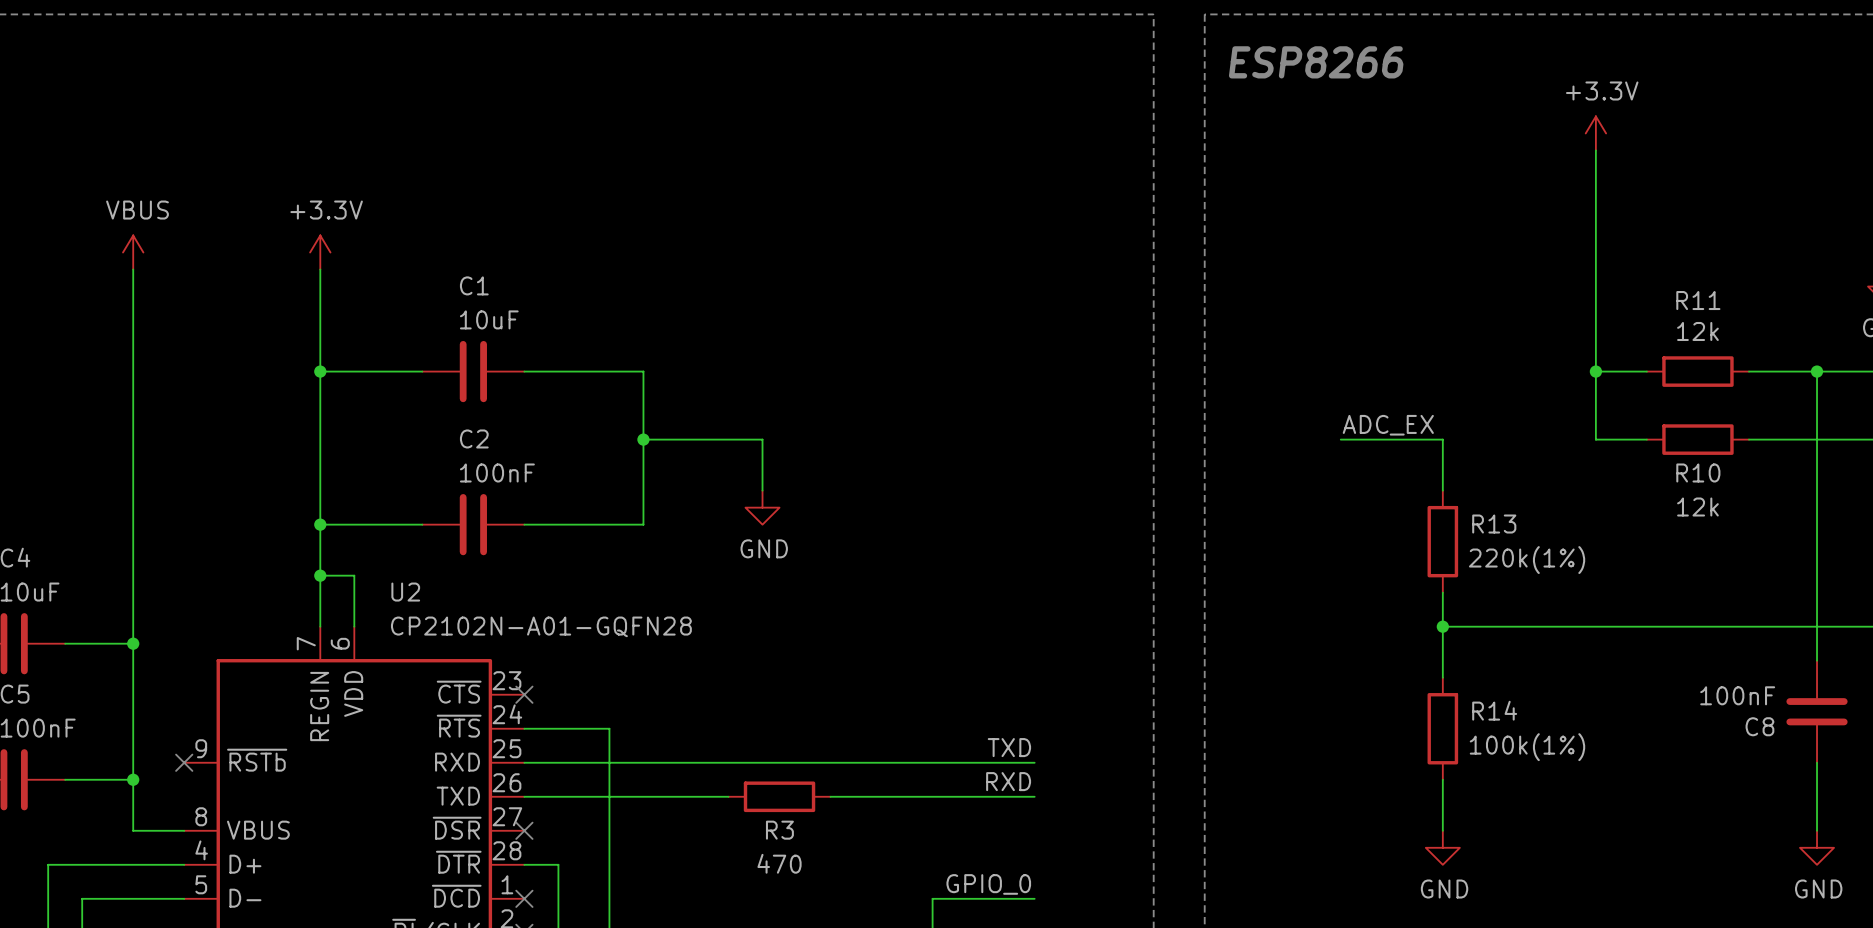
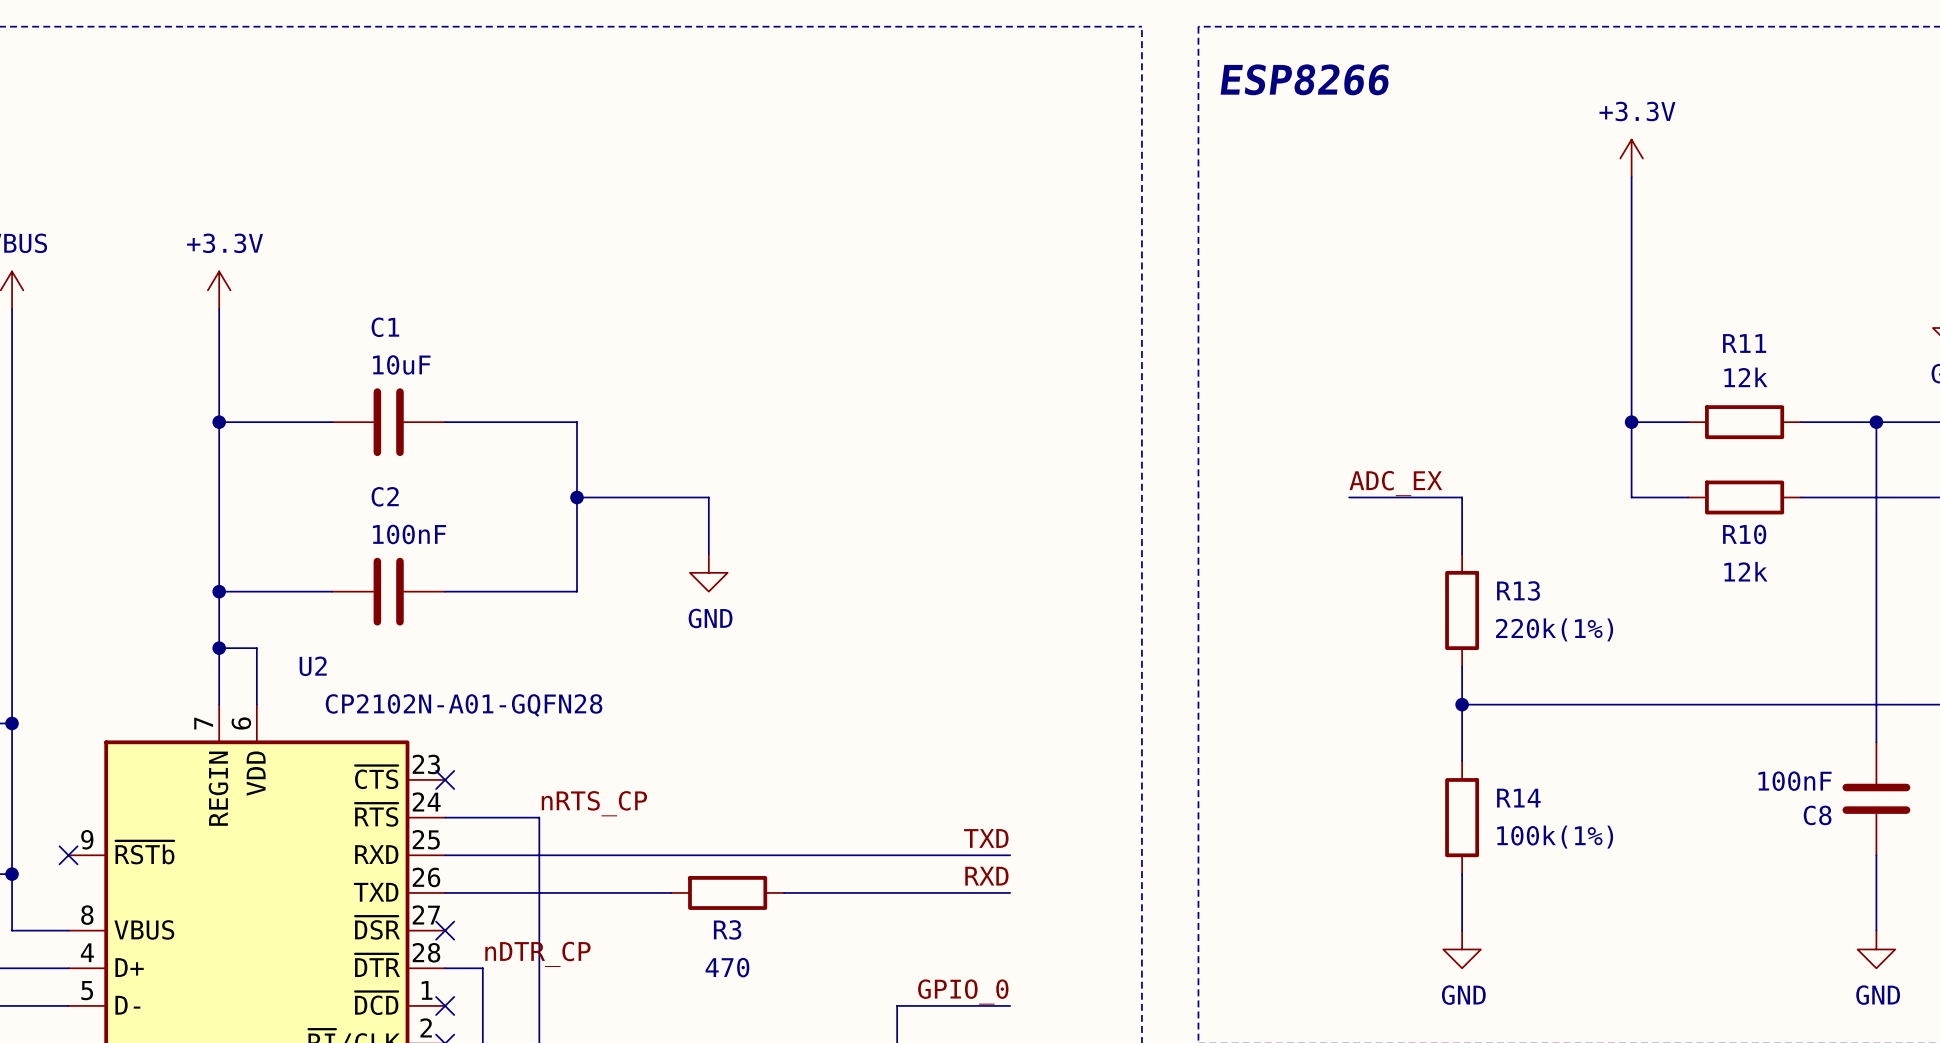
label: none -> nRTS_CP (594, 803)
label: none -> nDTR_CP (537, 954)

